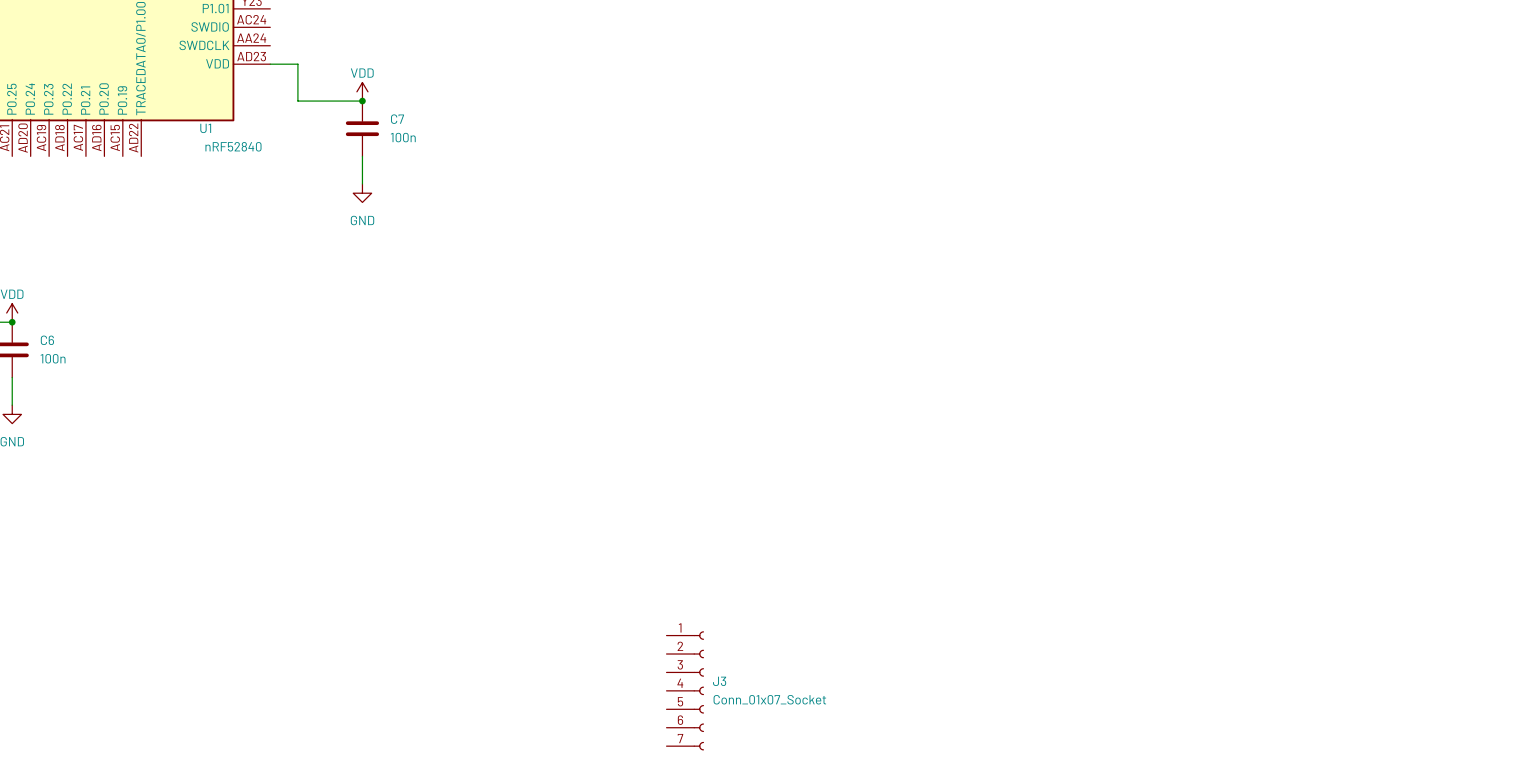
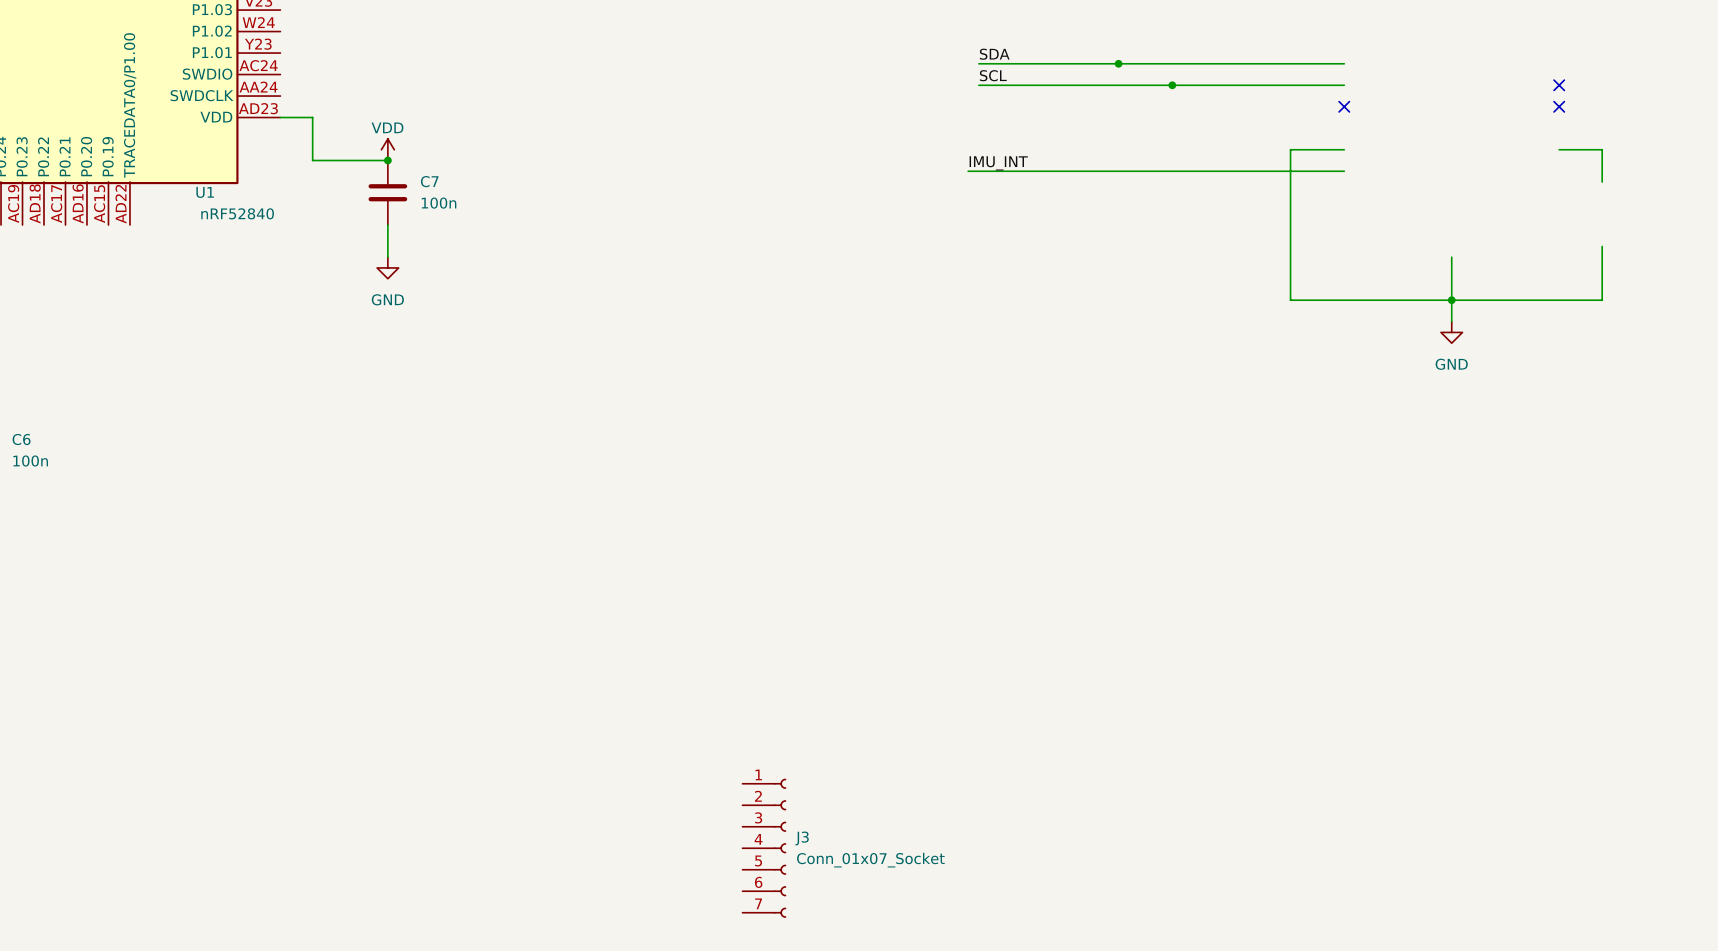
label: none -> SDA (994, 54)
wire: none -> (978, 63) (1344, 63)
junction: none -> (1118, 63)
label: none -> SCL (993, 75)
wire: none -> (978, 85) (1344, 85)
junction: none -> (1172, 85)
no-connect mark: none -> (1559, 85)
no-connect mark: none -> (1344, 106)
no-connect mark: none -> (1559, 106)
wire: none -> (1344, 149) (1290, 149) (1290, 300) (1602, 300) (1602, 246)
wire: none -> (1559, 149) (1602, 149) (1602, 181)
label: none -> IMU_INT (998, 163)
wire: none -> (968, 171) (1344, 171)
wire: none -> (1451, 257) (1451, 321)
junction: none -> (1451, 300)
power symbol: none -> GND (1451, 332)

